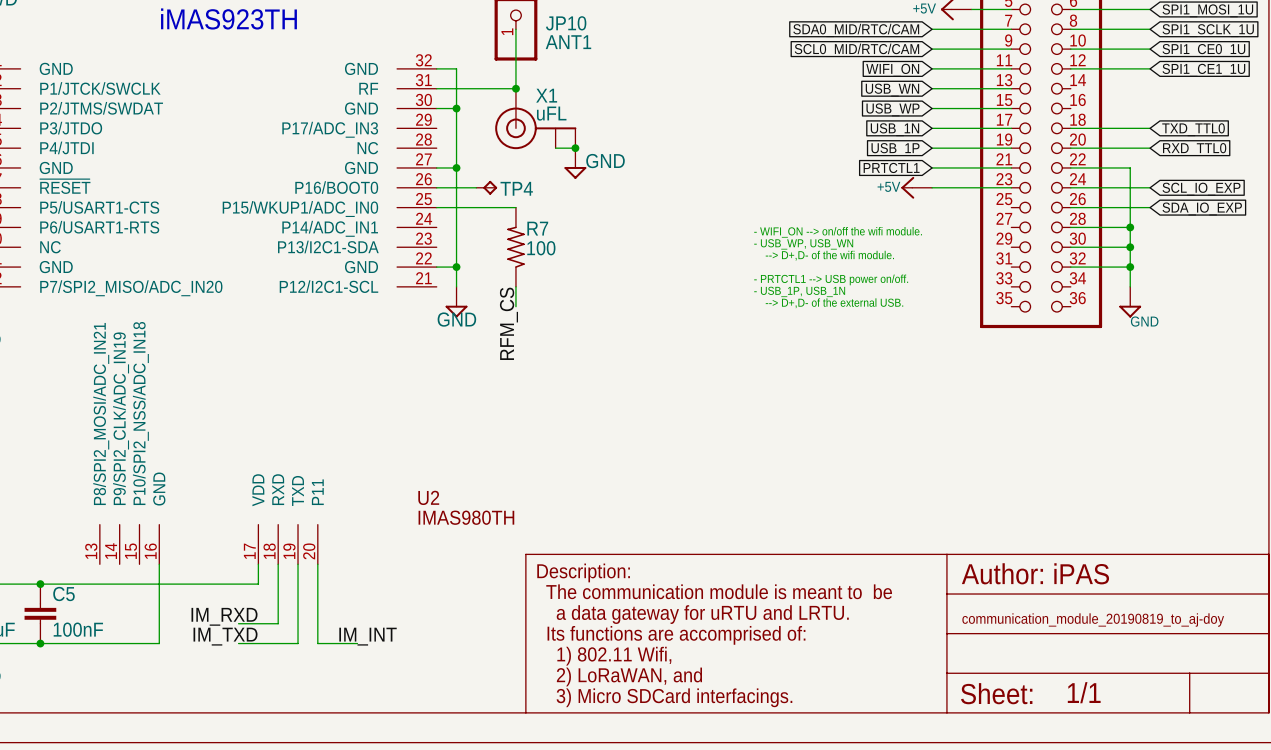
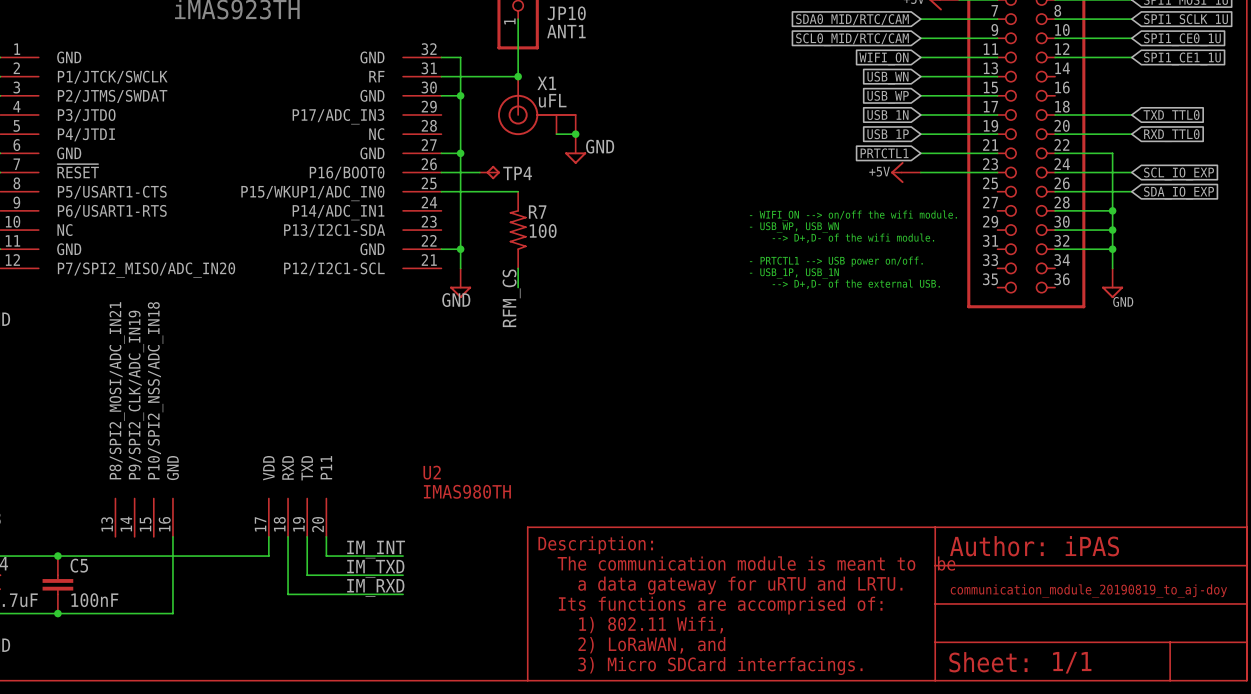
wire: (317, 584) (317, 643) (357, 643) -> (326, 556) (403, 556)
wire: (298, 603) (298, 643) (238, 643) -> (307, 575) (403, 575)
label position: IM_RXD (224, 616) -> IM_RXD (375, 587)
wire: (238, 623) (278, 623) -> (403, 594) (288, 594)
label position: IM_TXD (225, 636) -> IM_TXD (375, 568)
label position: IM_INT (368, 636) -> IM_INT (376, 549)

